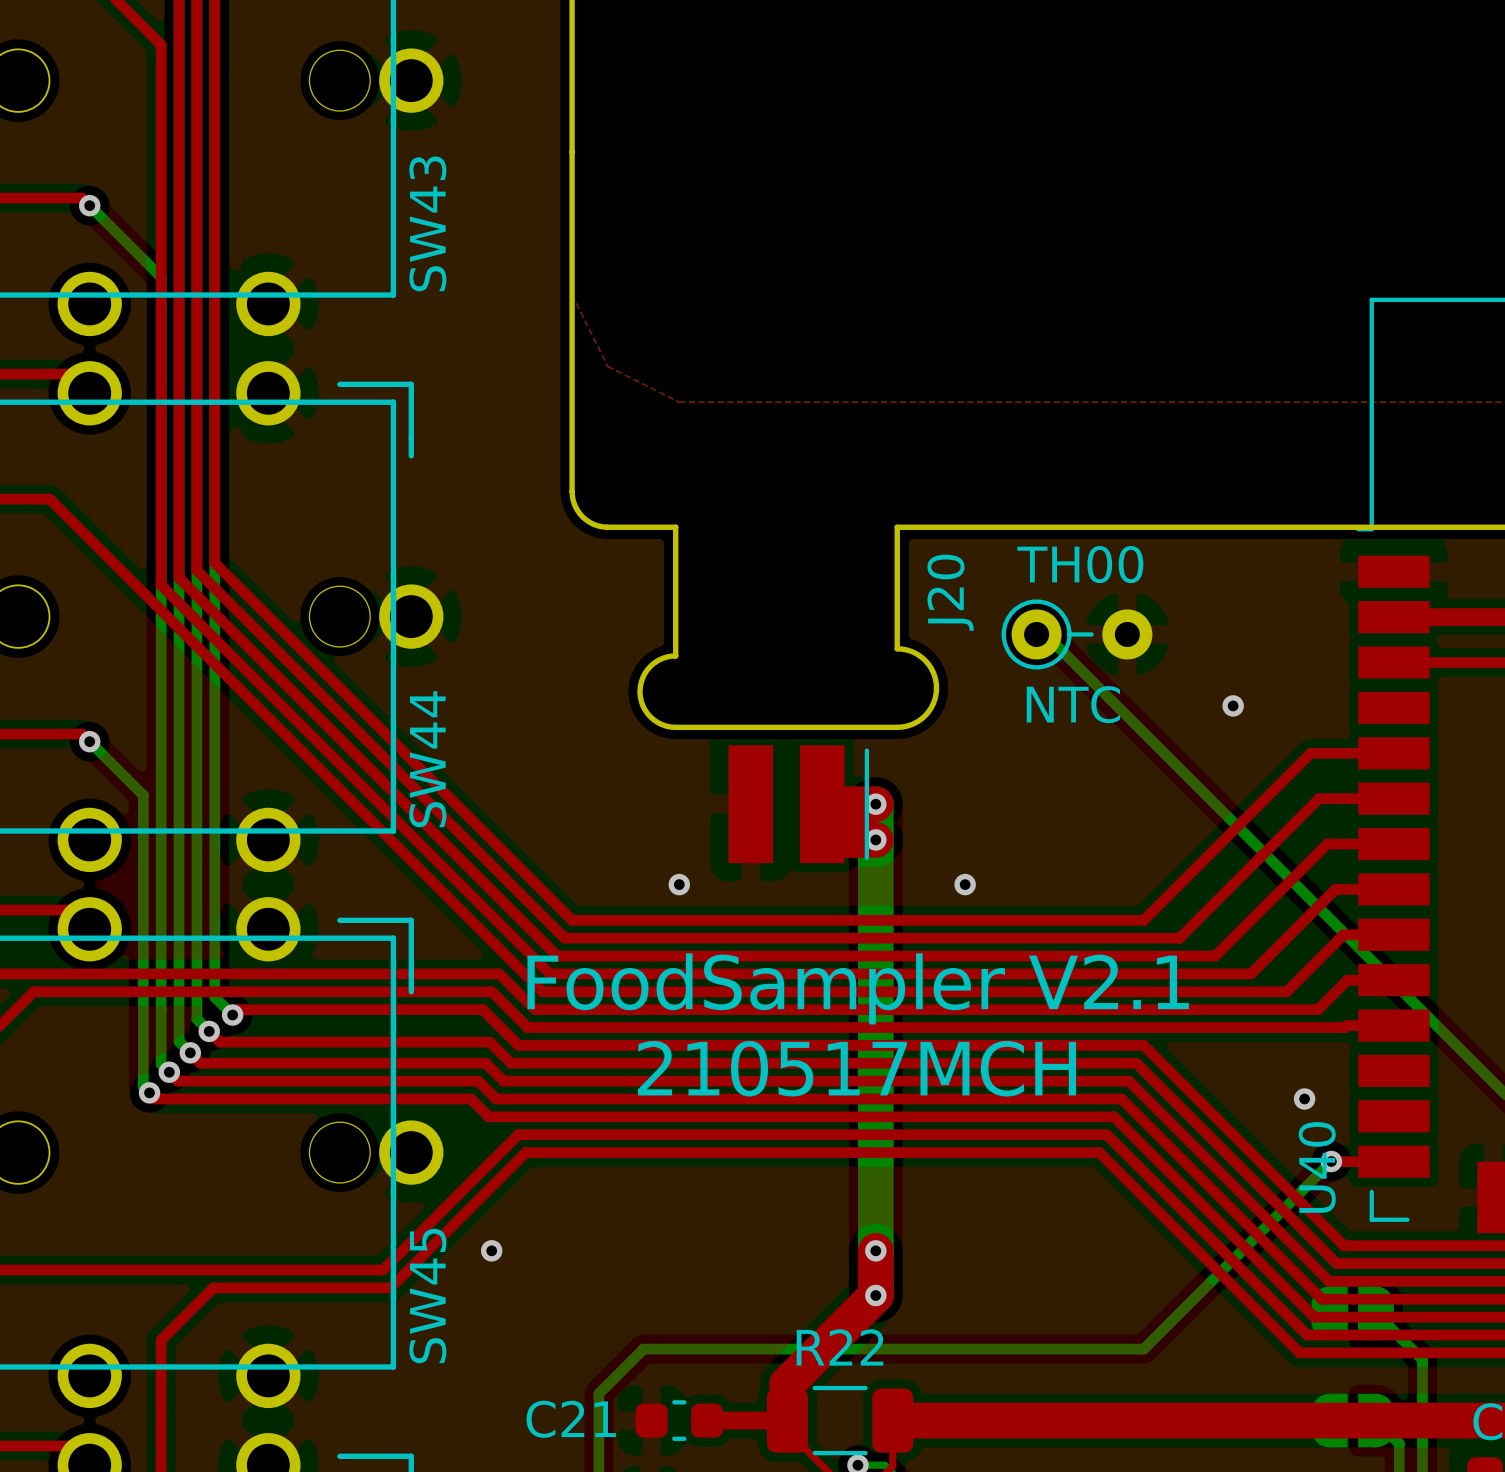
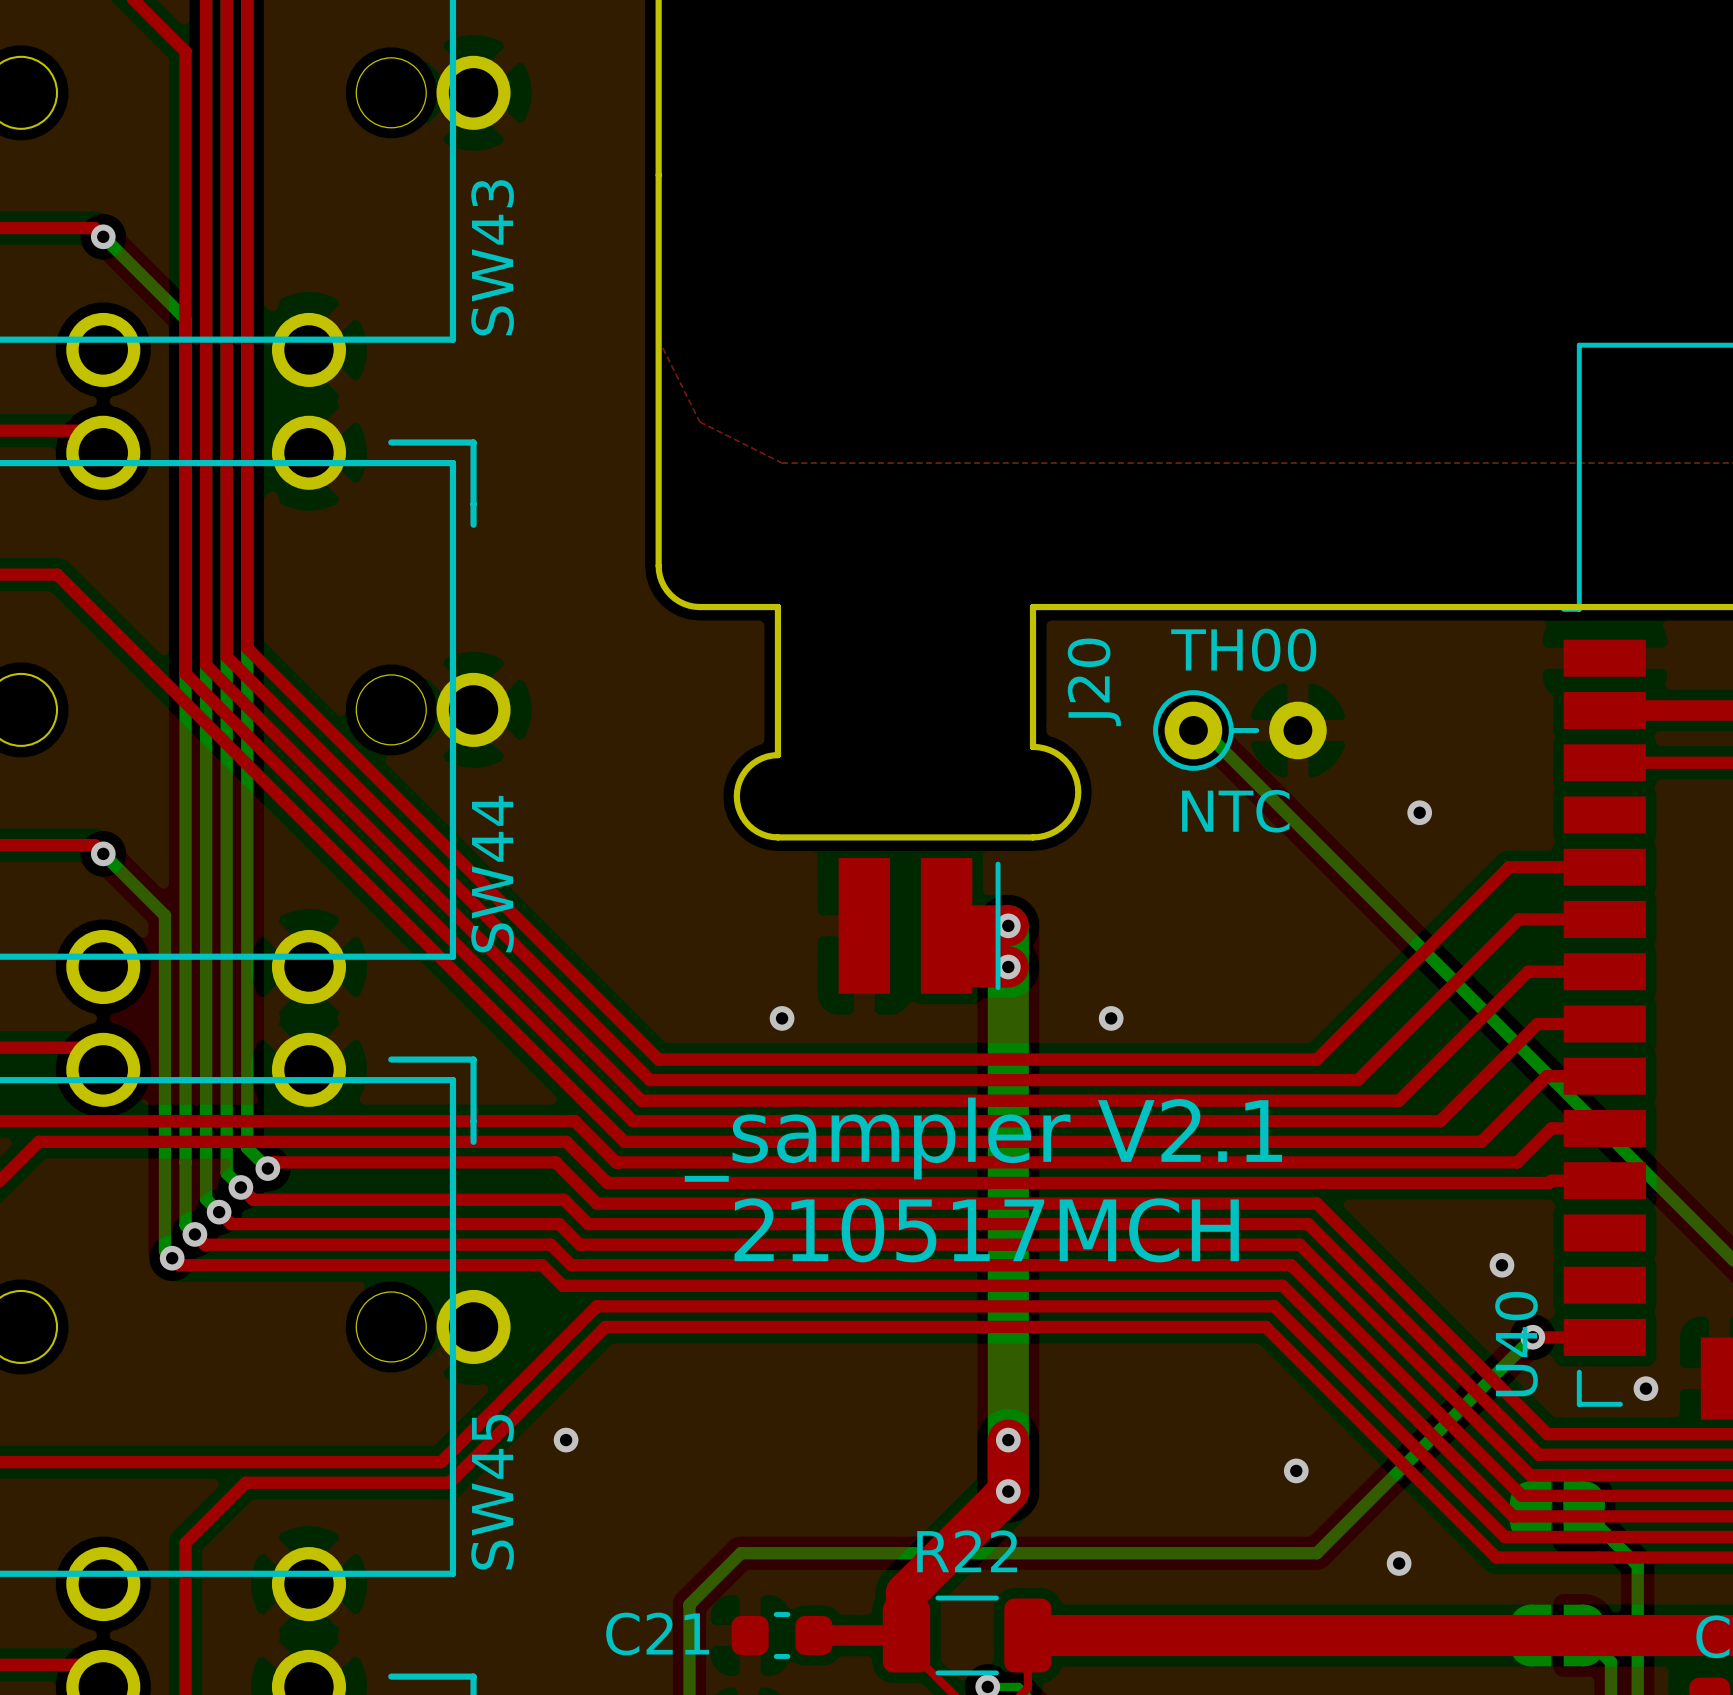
text: FoodSampler V2.1 (858, 988) -> _sampler V2.1 (983, 1139)
via: none -> (1645, 1388)
via: none -> (1296, 1470)
via: none -> (1399, 1563)

